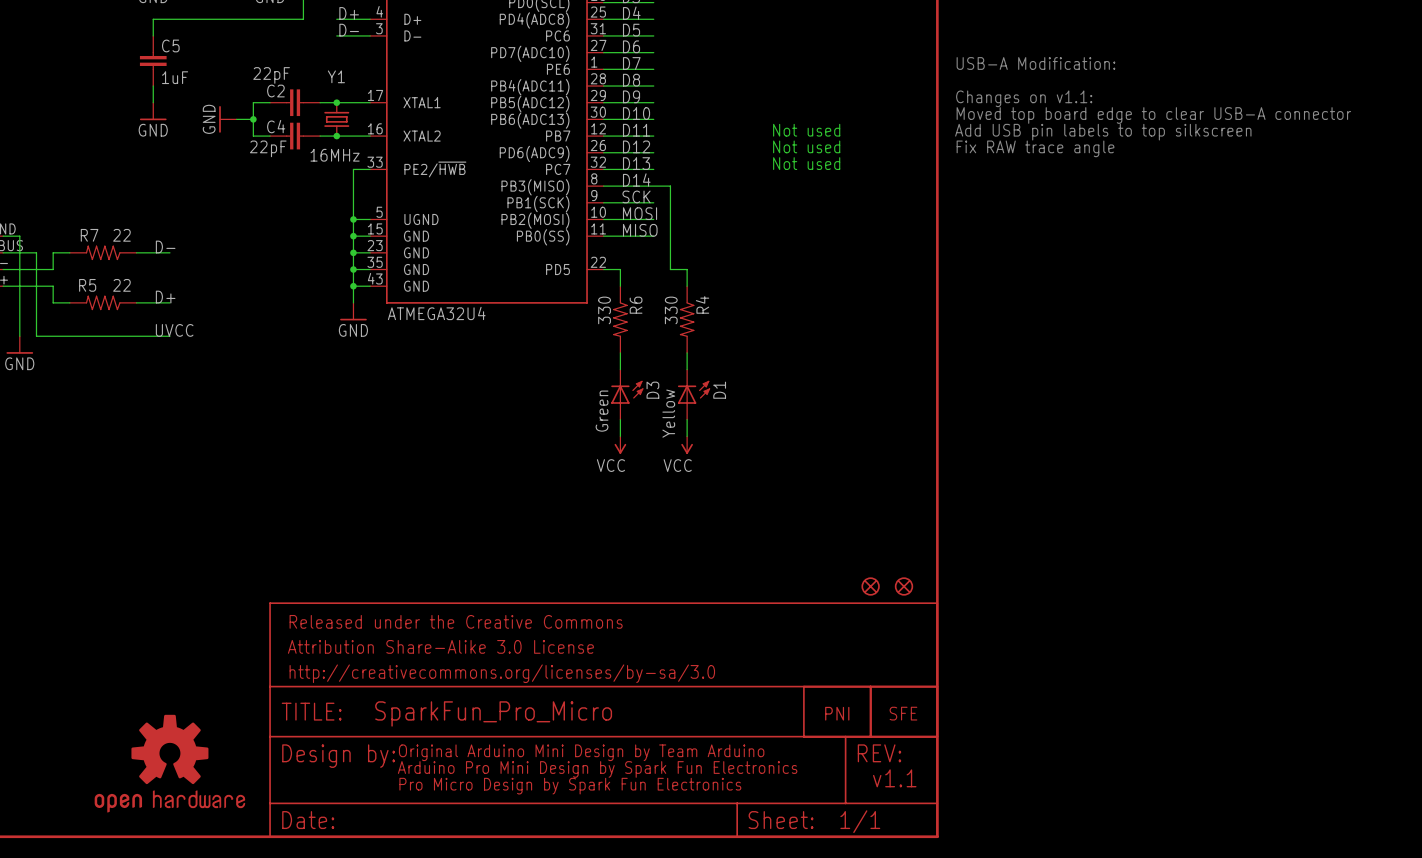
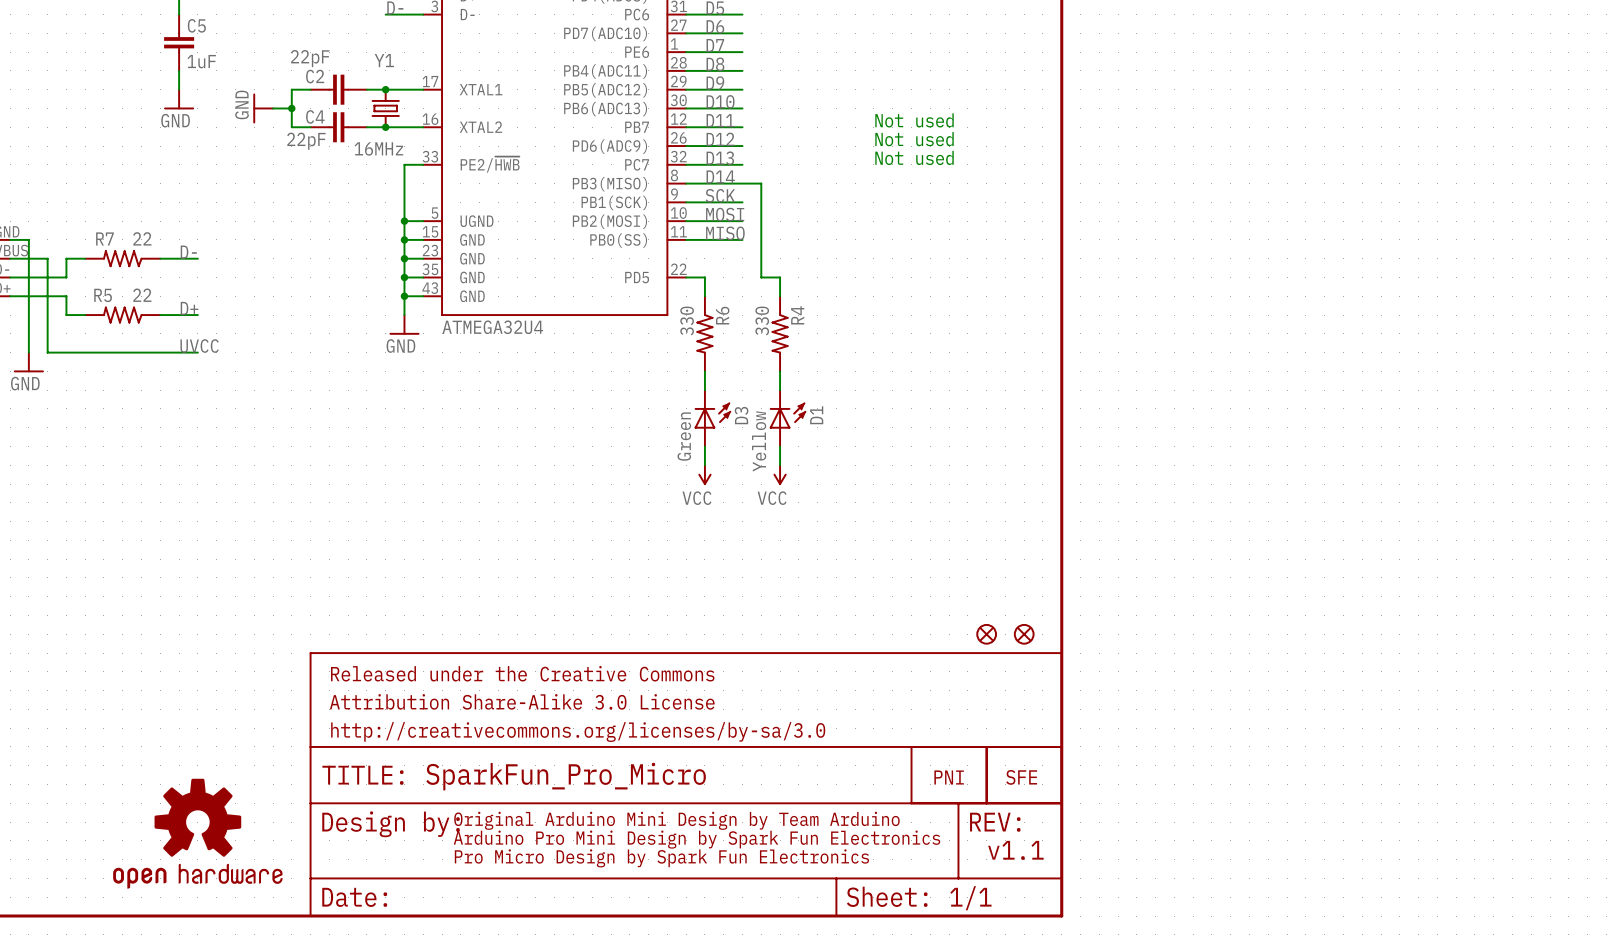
text: USB-A Modification: (1035, 63) -> none
text: Changes on v1.1: (1024, 98) -> none
text: Moved top board edge to clear USB-A connector (1153, 115) -> none
text: Add USB pin labels to top silkscreen (1103, 132) -> none
text: Fix RAW trace angle (1035, 148) -> none

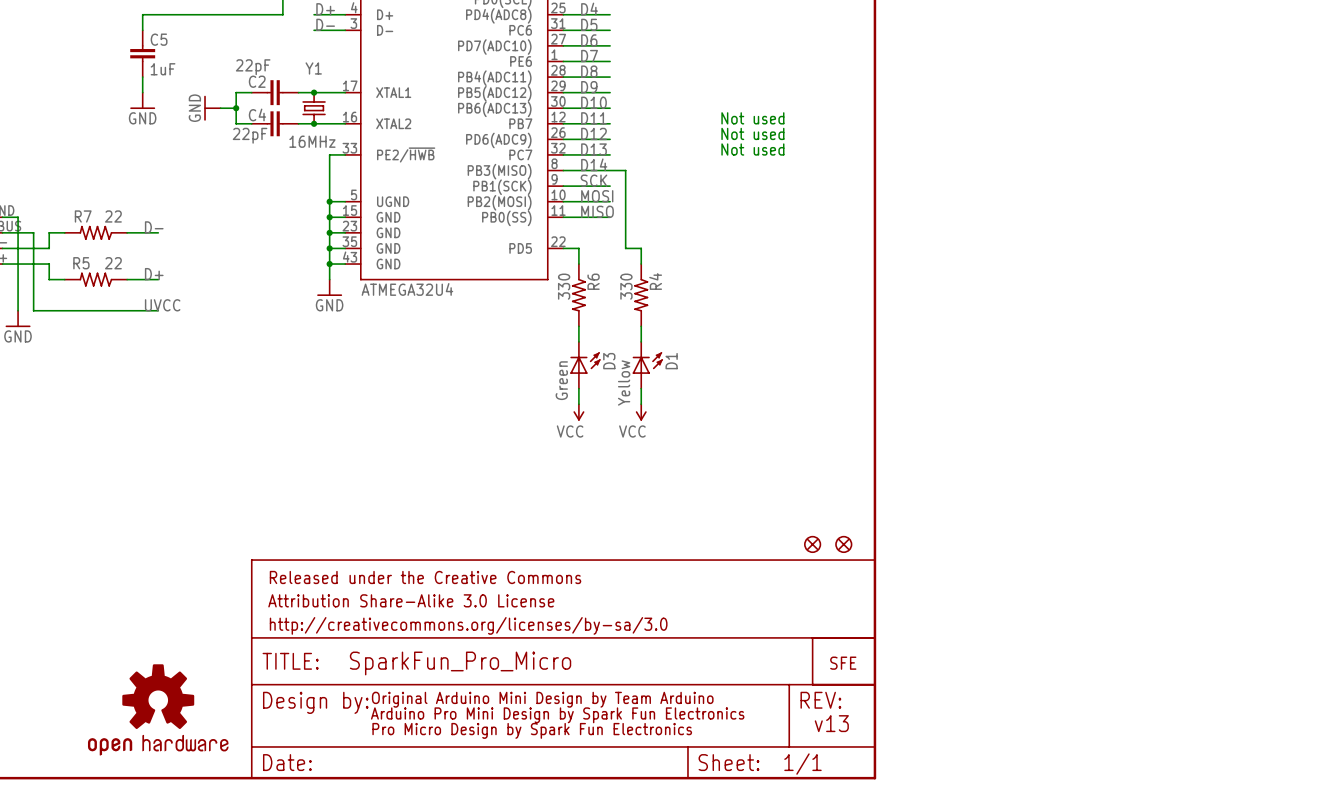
part: (949, 775) -> none
text: v1.1 (1015, 850) -> v13 (831, 723)

